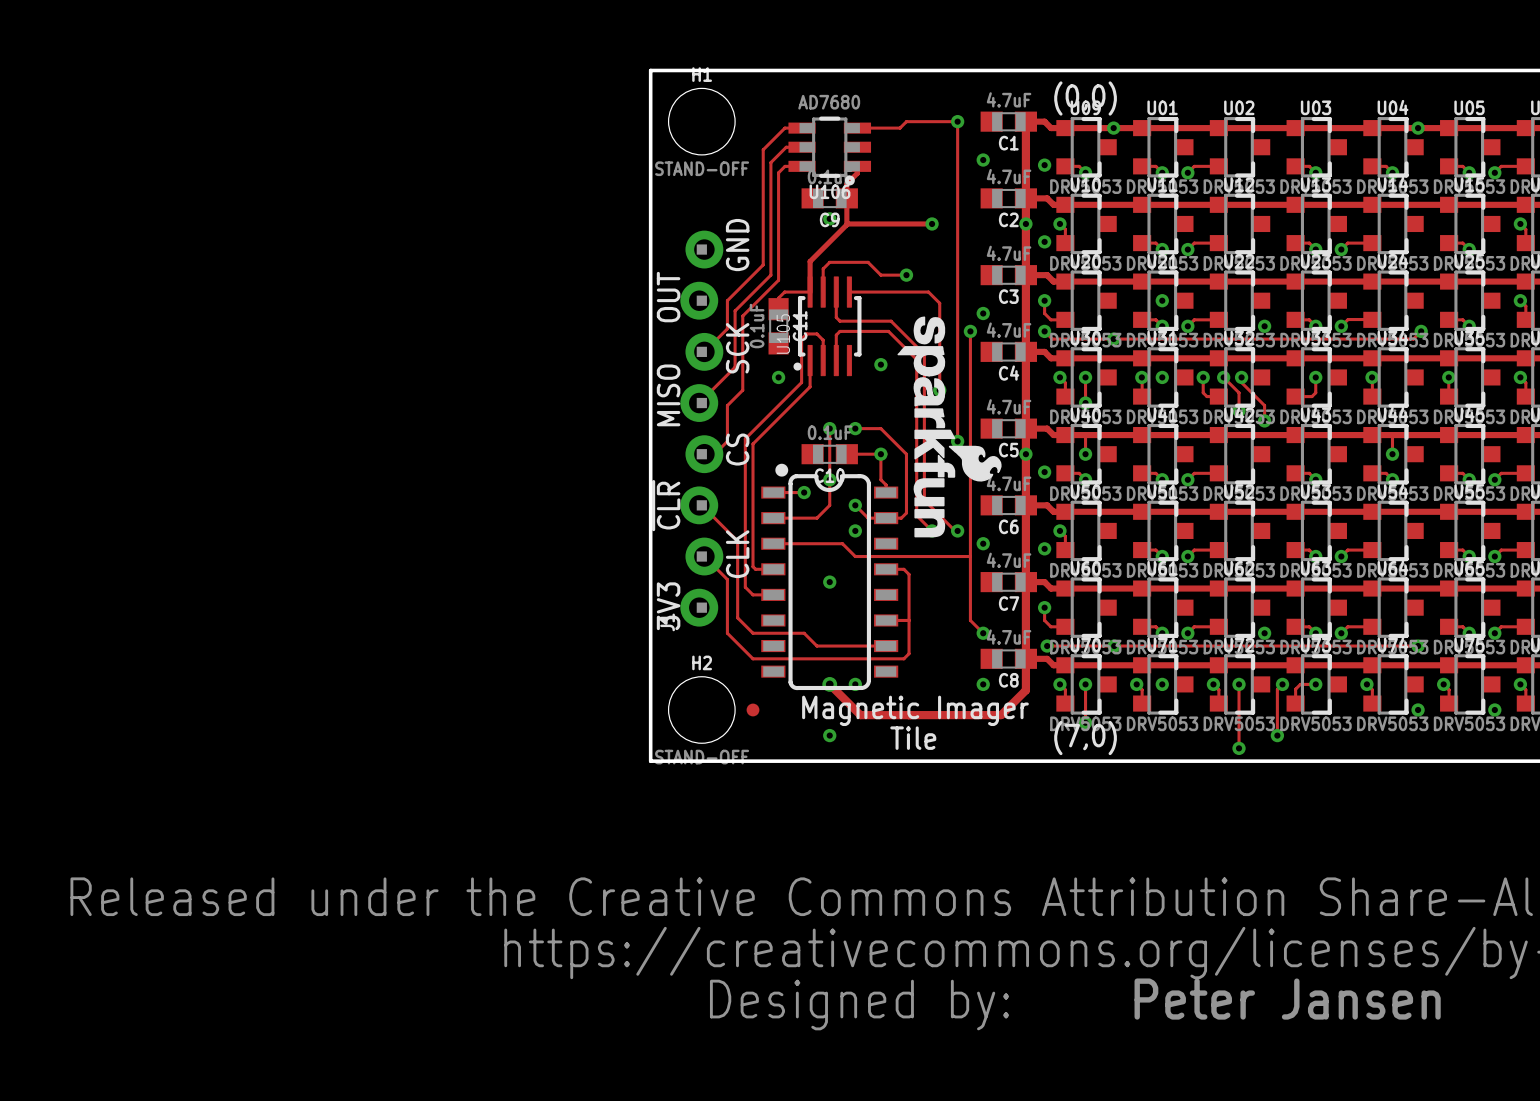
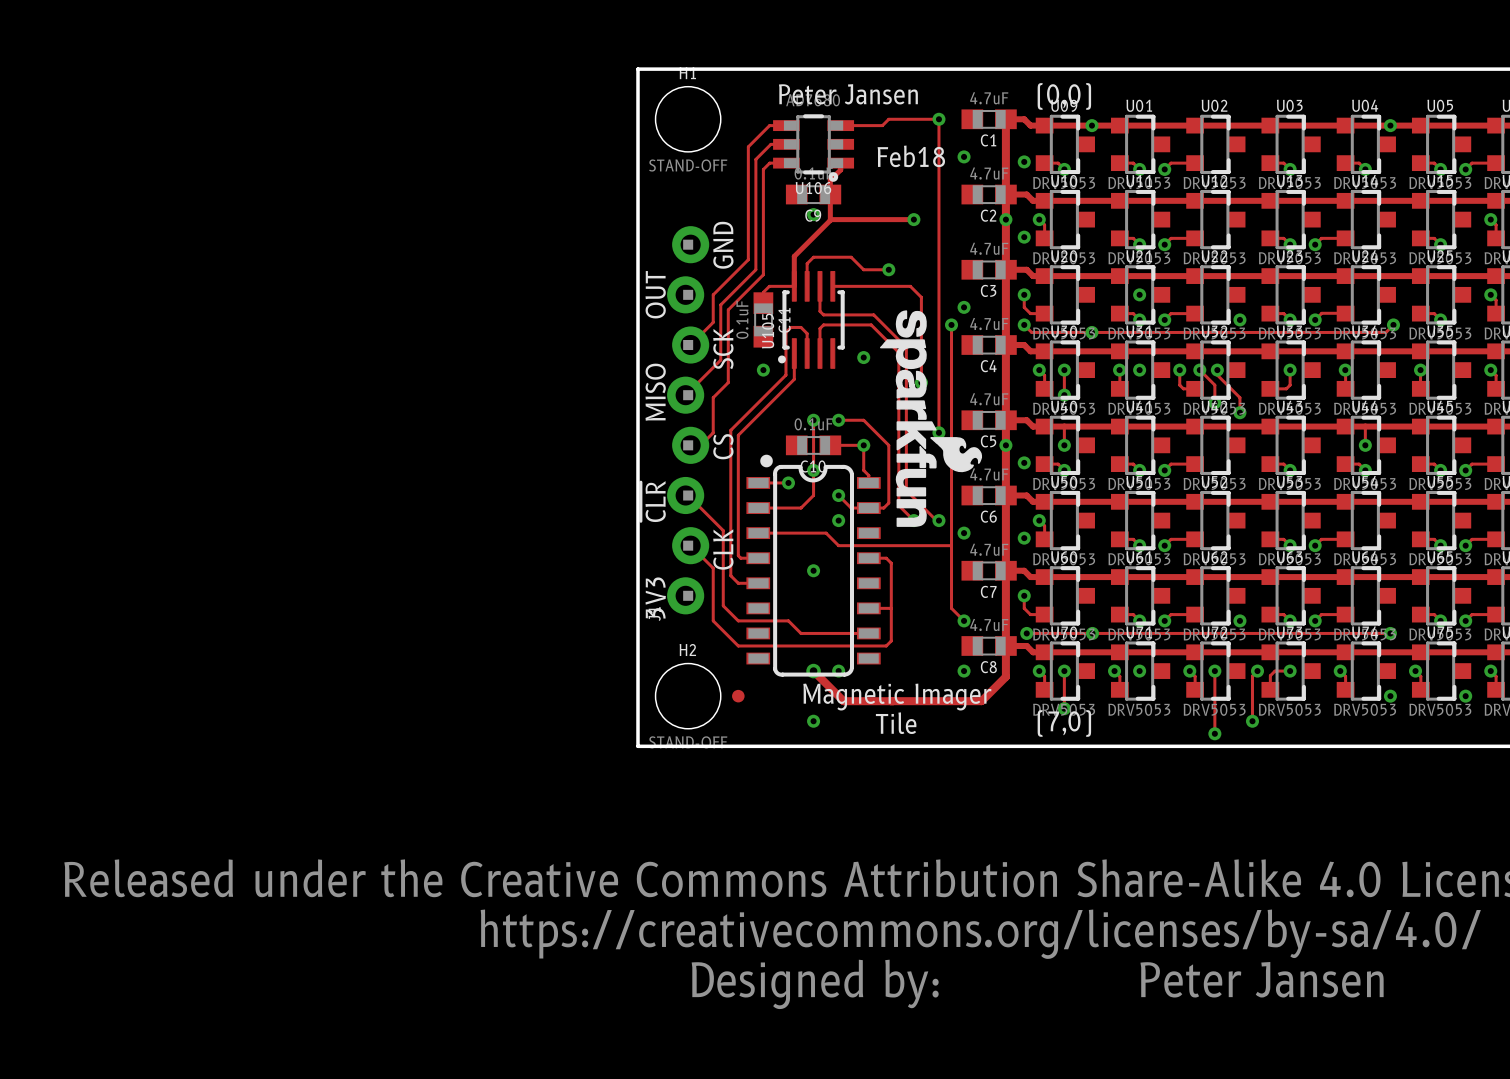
text: none -> Peter Jansen (848, 94)
text: none -> Feb18 (911, 156)

